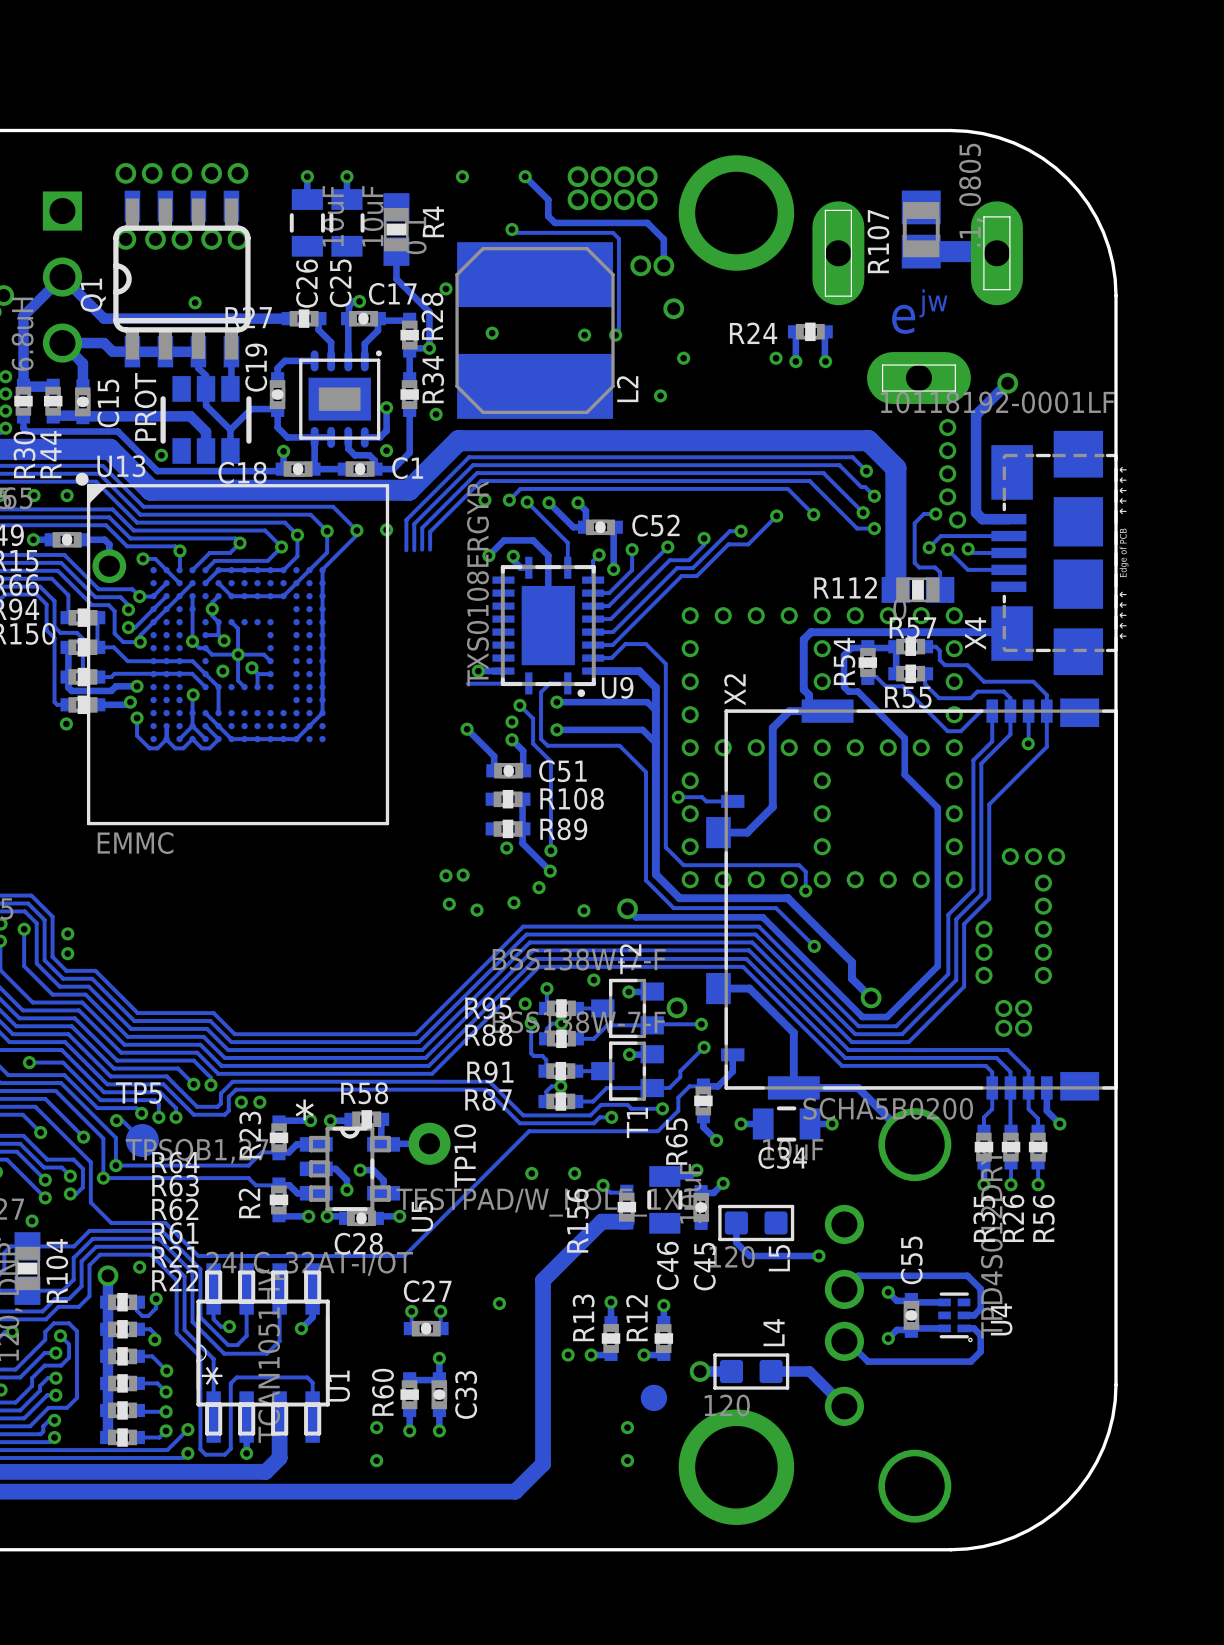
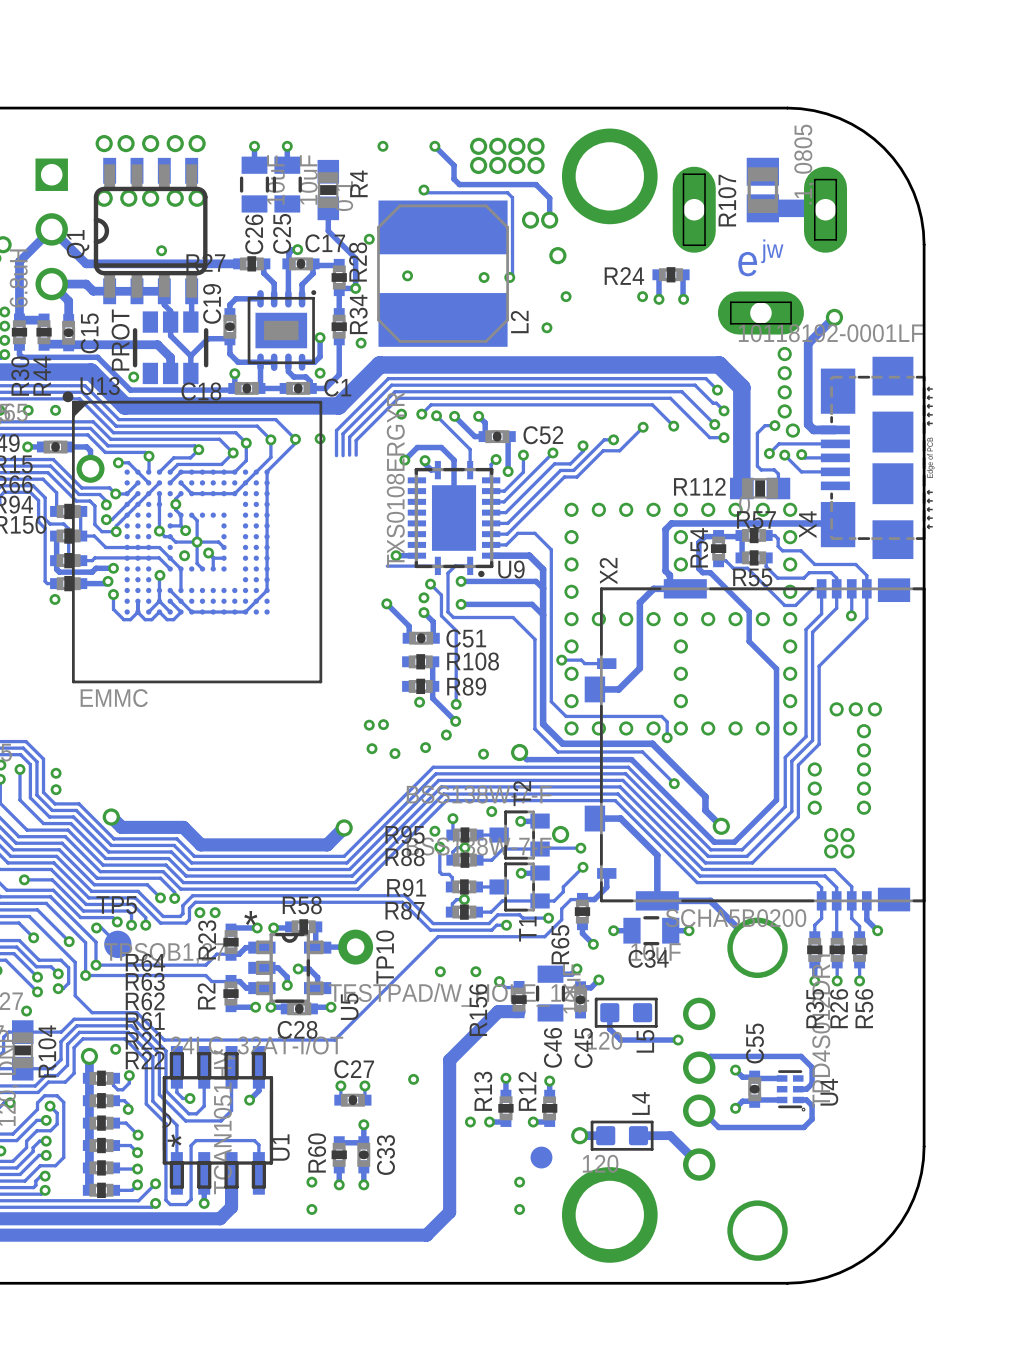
track: none -> (111, 817) (121, 827) (183, 827) (200, 844) (327, 844) (344, 827)
via: none -> (111, 817)
via: none -> (344, 827)

